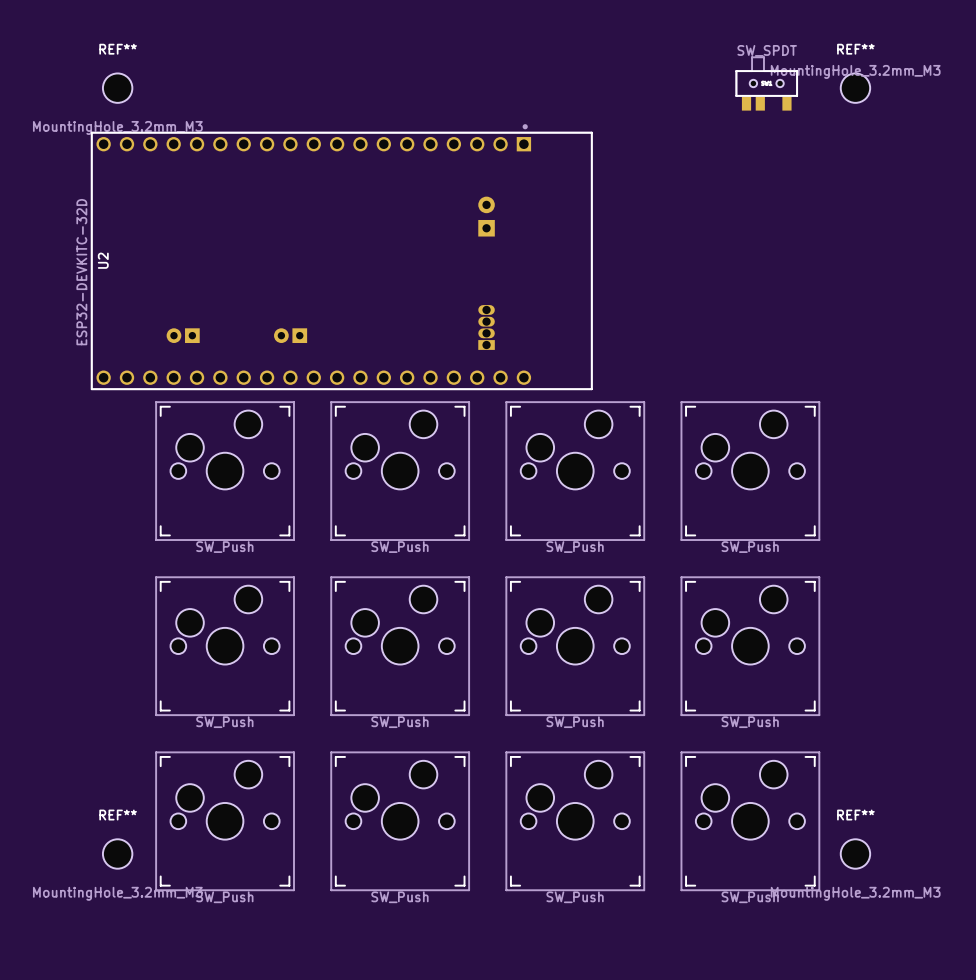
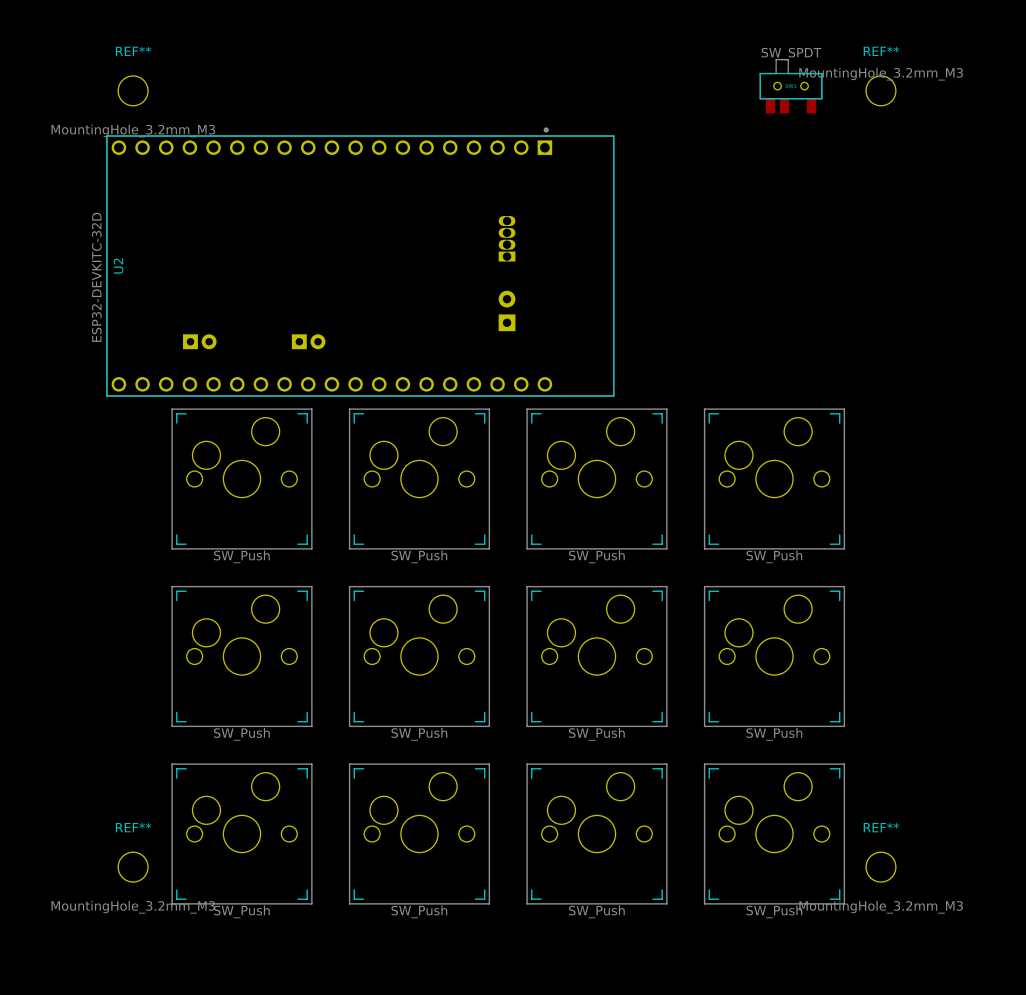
part position: (486, 216) -> (507, 310)
part position: (486, 327) -> (507, 238)
part rotation: 0° (183, 335) -> 180° (199, 341)
part rotation: 0° (290, 335) -> 180° (308, 341)

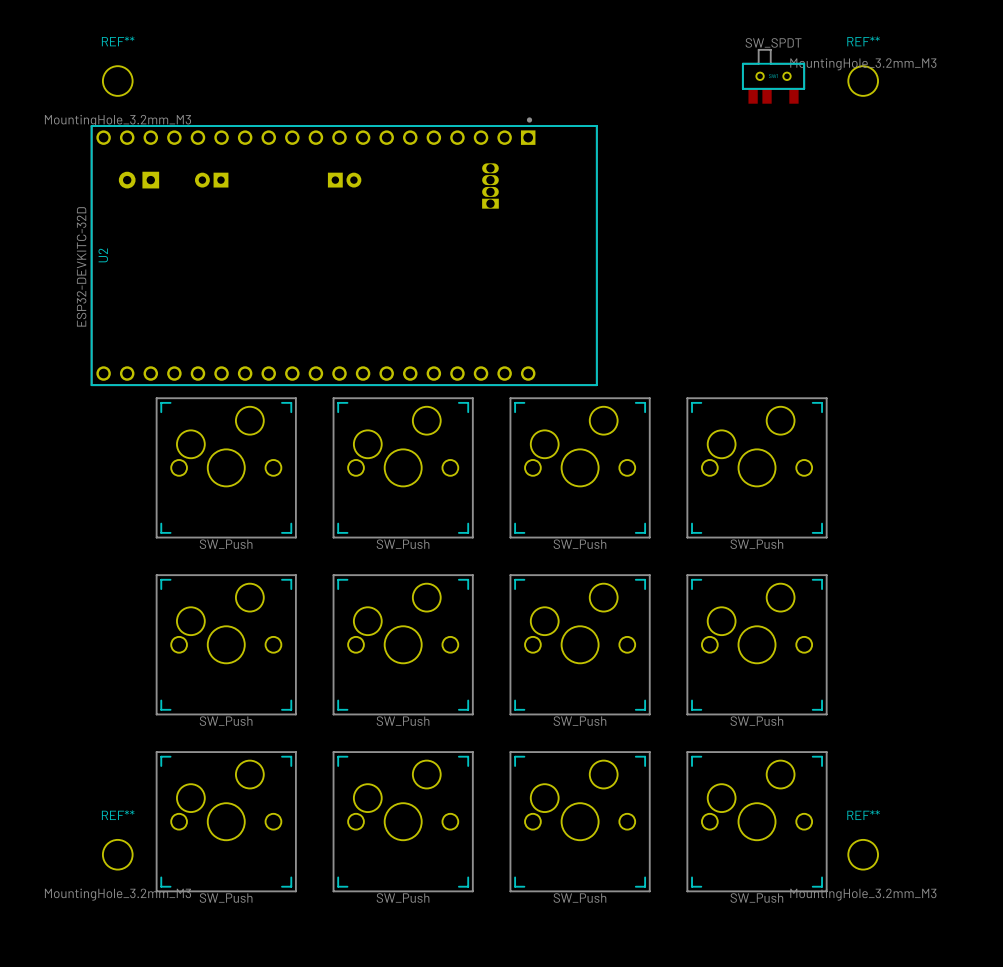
part: none -> (138, 180)
part: none -> (211, 180)
part: none -> (344, 180)
part position: (507, 238) -> (490, 185)
part: (507, 310) -> none
part: (199, 341) -> none
part: (308, 341) -> none

